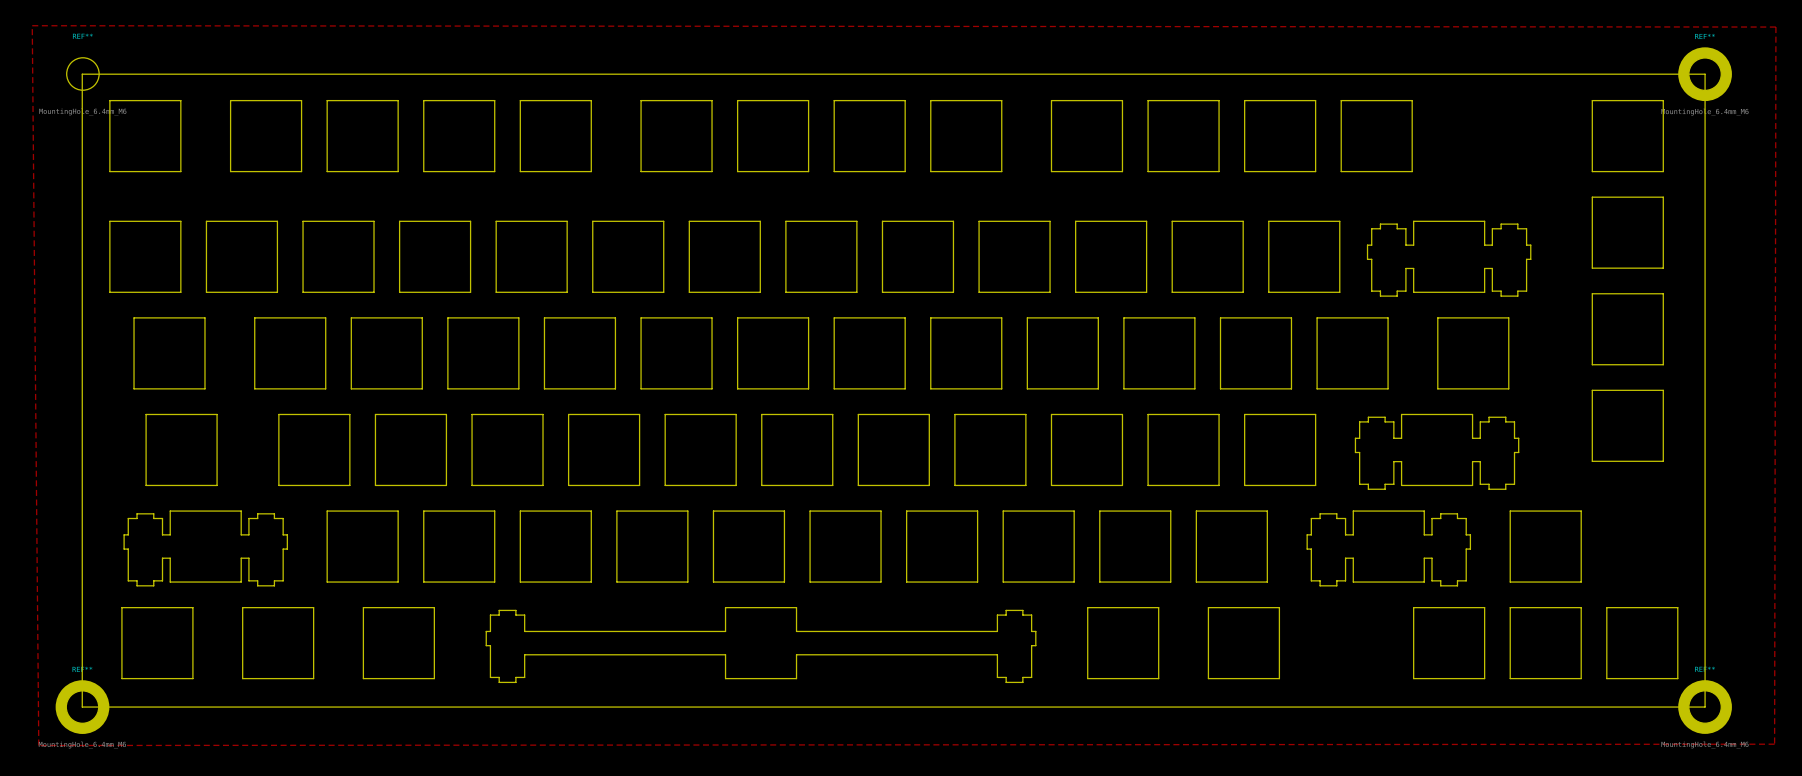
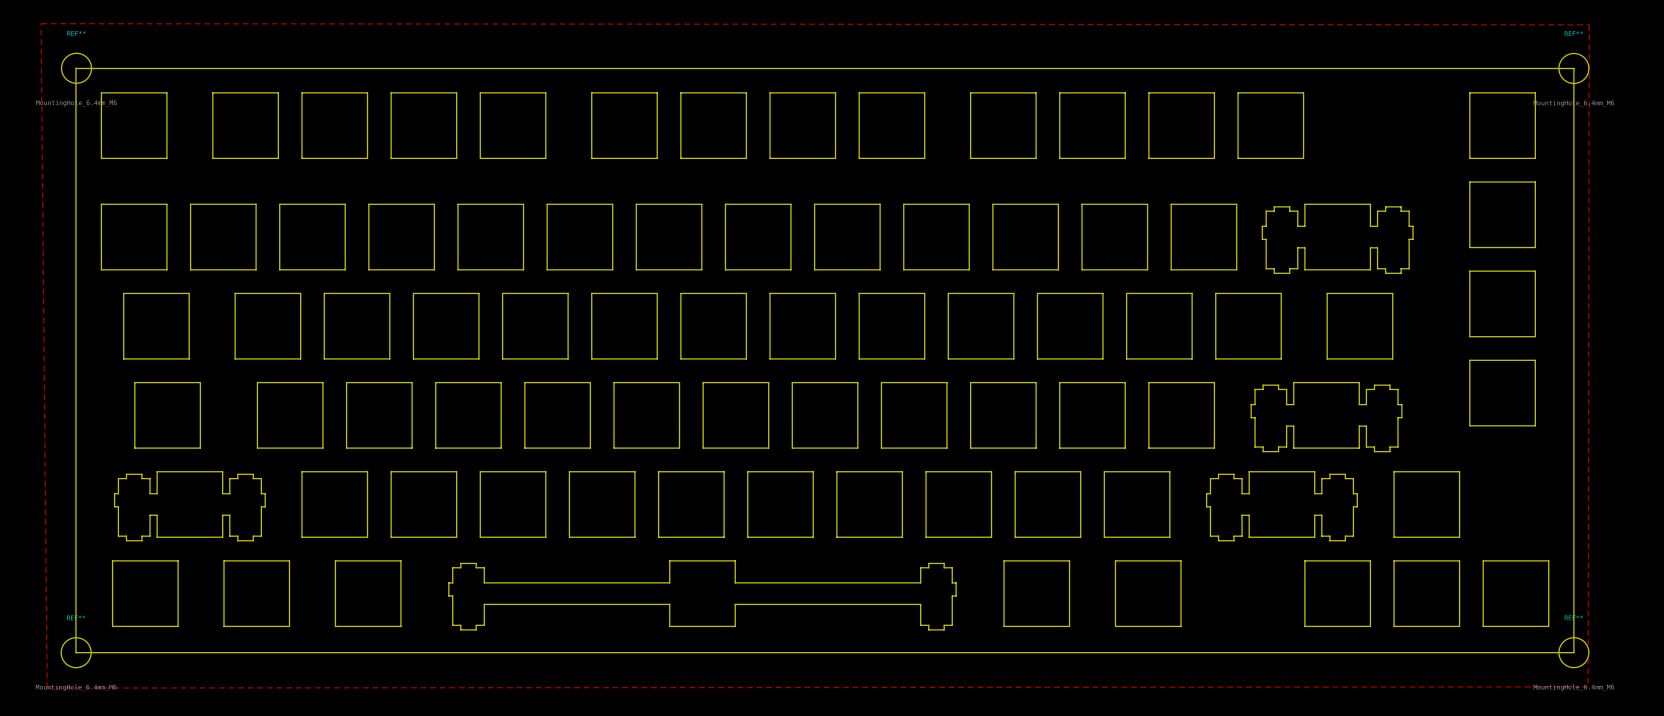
zone outline: (32, 25) (38, 745) (1774, 744) (1775, 27) (32, 25) -> (41, 23) (47, 688) (1588, 686) (1589, 24) (41, 23)
part: (1705, 74) -> none
part: (82, 707) -> none
part: (1705, 707) -> none

